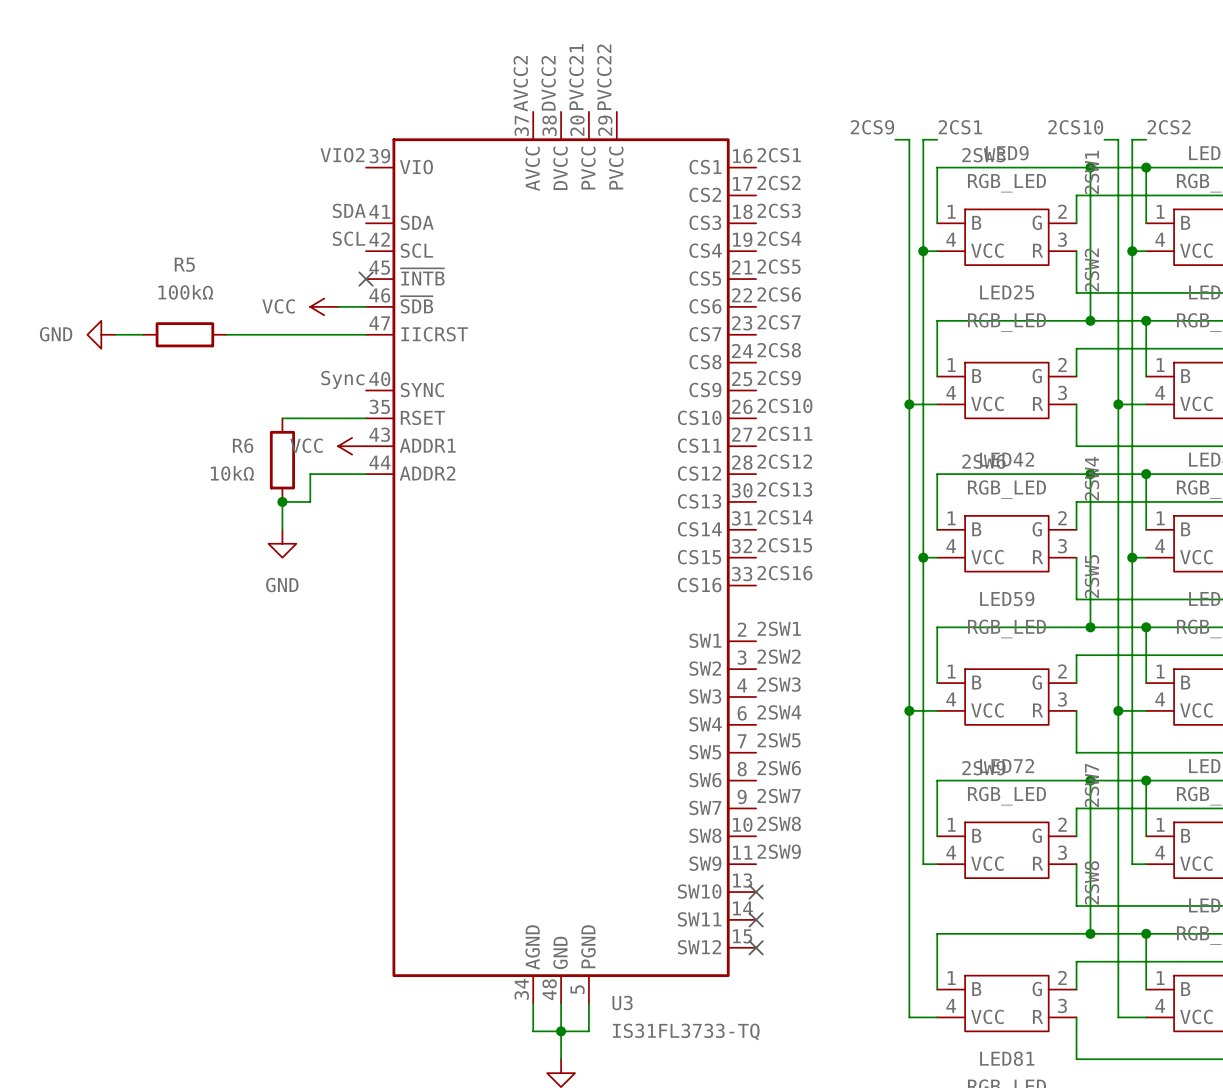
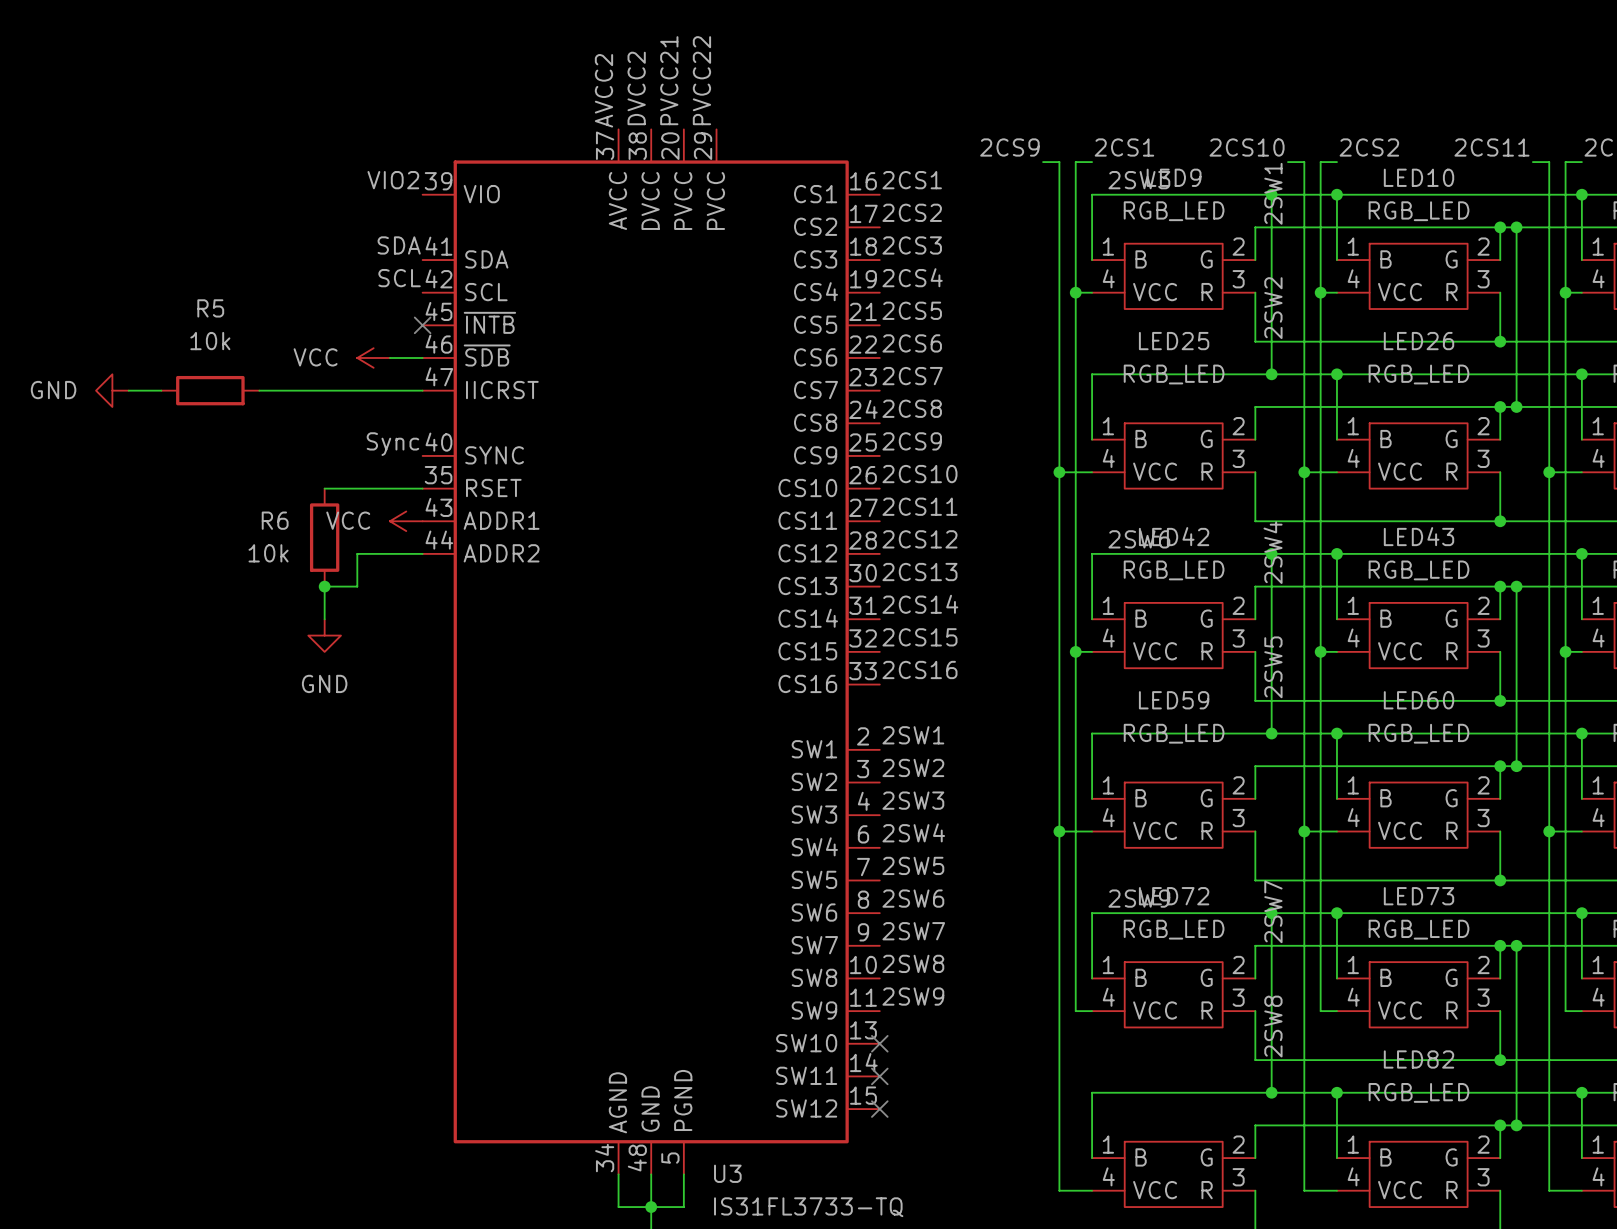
R5 value: 100kΩ (185, 292) -> 10k (210, 341)
R6 value: 10kΩ (232, 473) -> 10k (268, 553)

